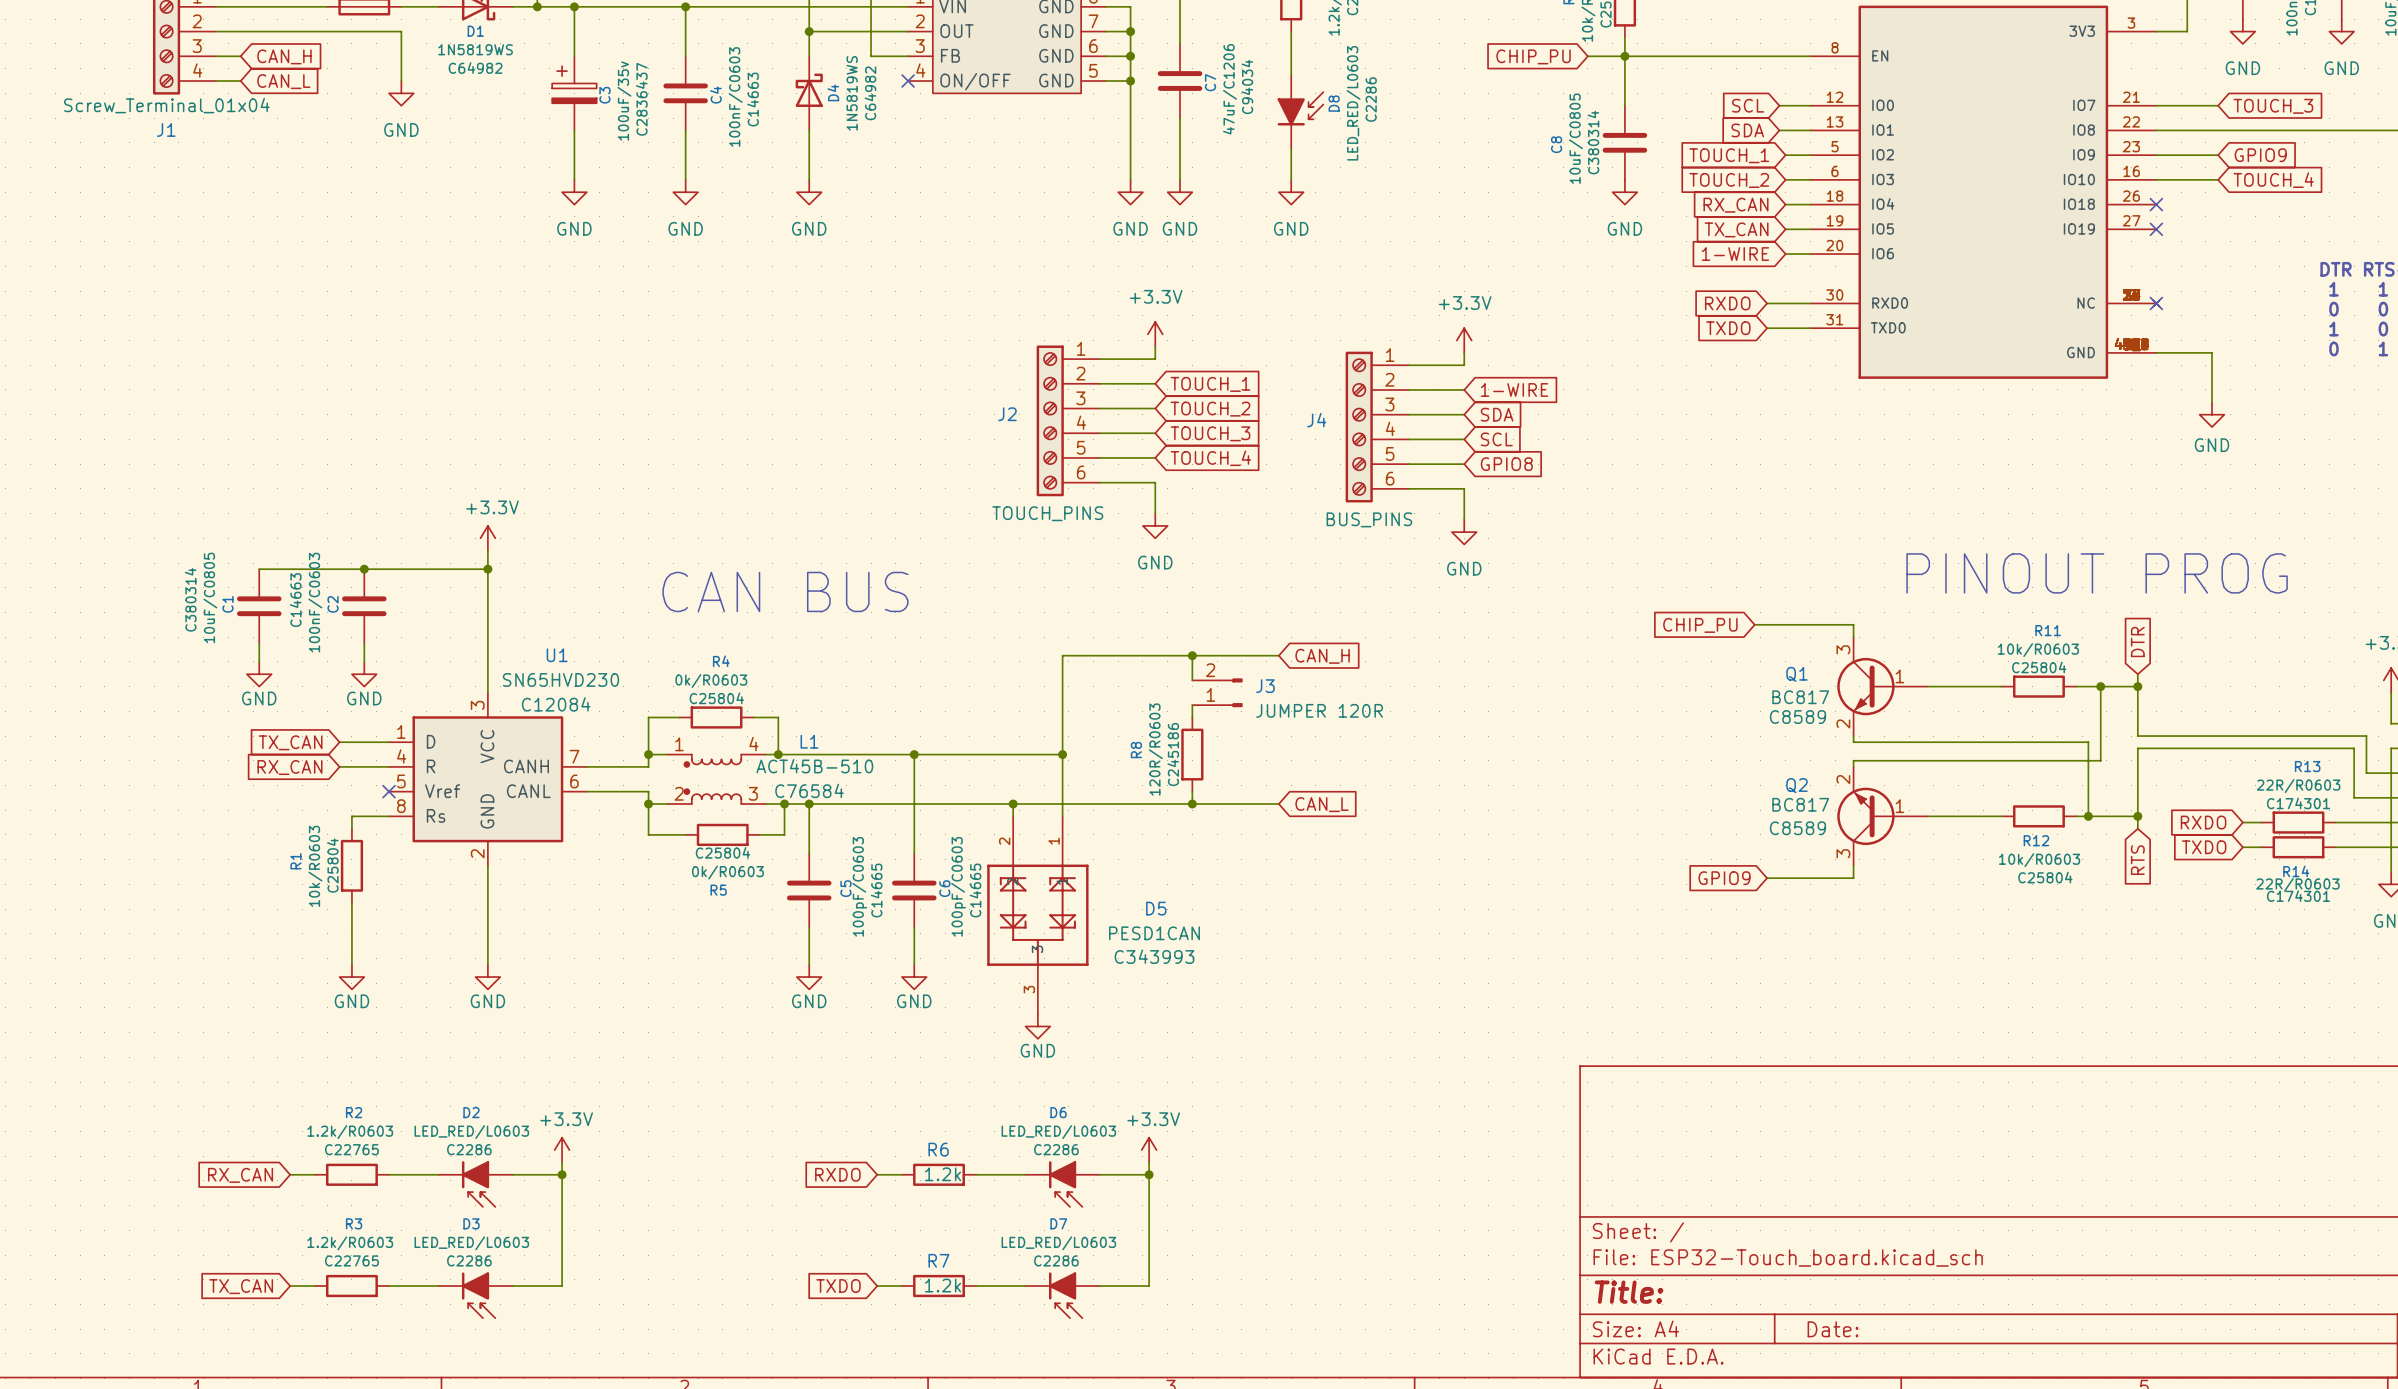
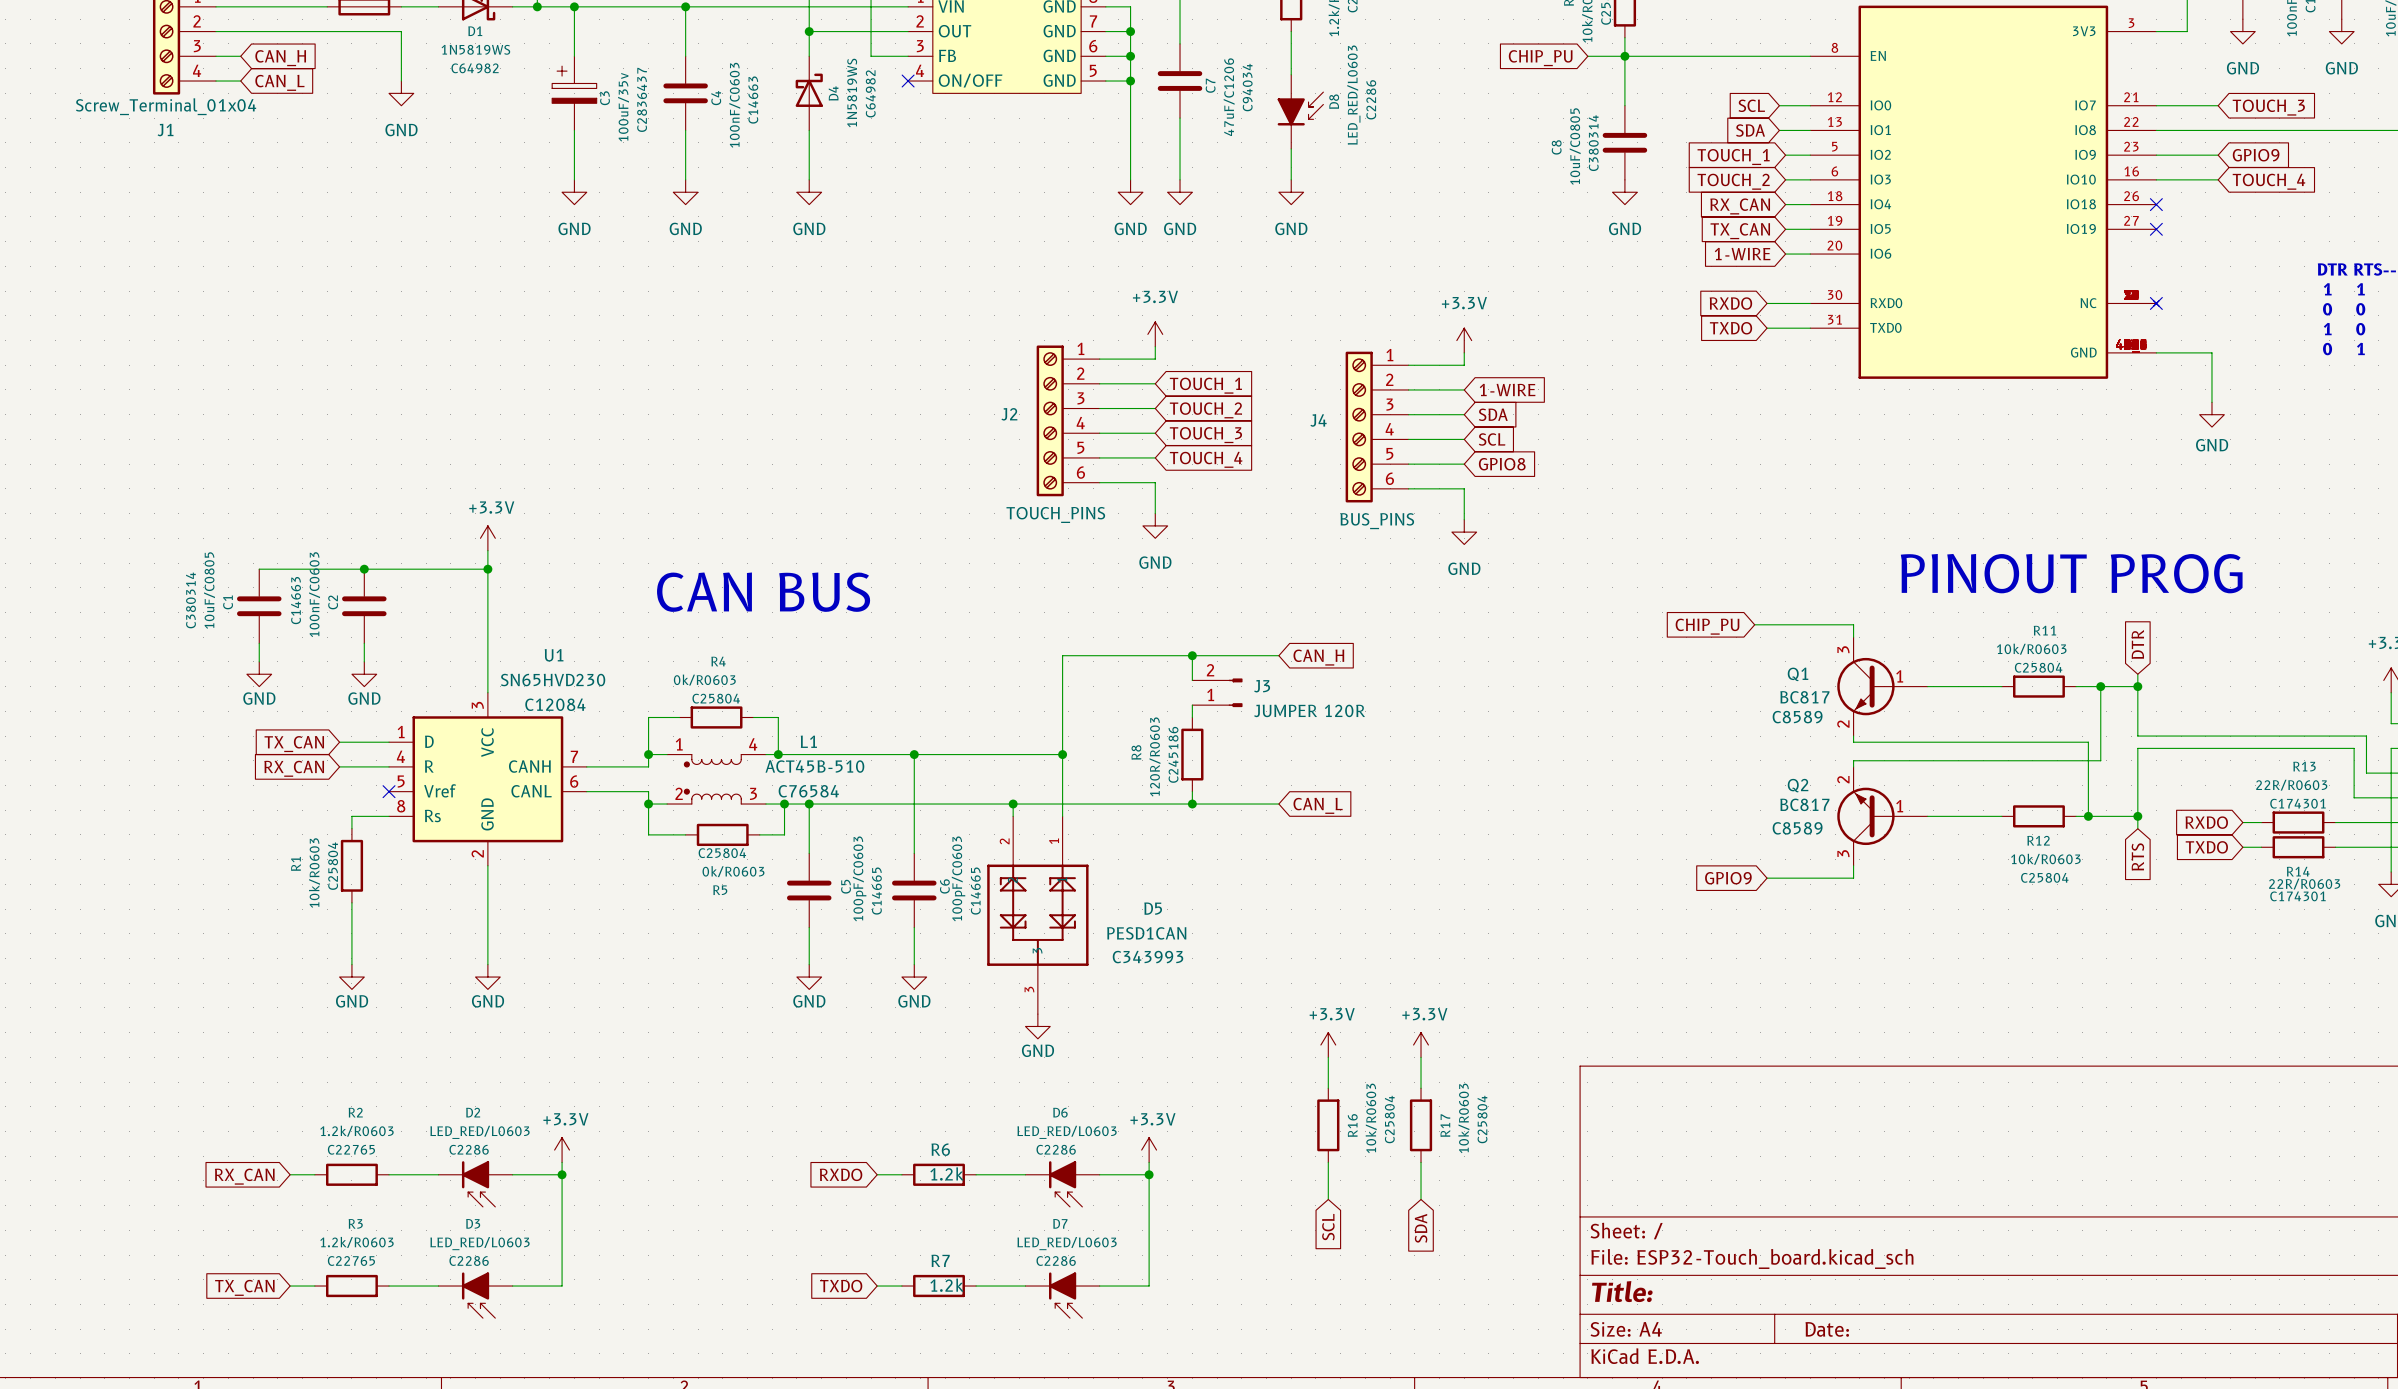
power symbol: none -> +3.3V (1328, 1045)
power symbol: none -> +3.3V (1421, 1045)
wire: none -> (1328, 1057) (1328, 1088)
wire: none -> (1421, 1057) (1421, 1088)
R16: none -> 10k/R0603 (1328, 1125)
R17: none -> 10k/R0603 (1421, 1125)
wire: none -> (1328, 1162) (1328, 1199)
wire: none -> (1421, 1162) (1421, 1199)
global label: none -> SCL (1328, 1227)
global label: none -> SDA (1421, 1228)

